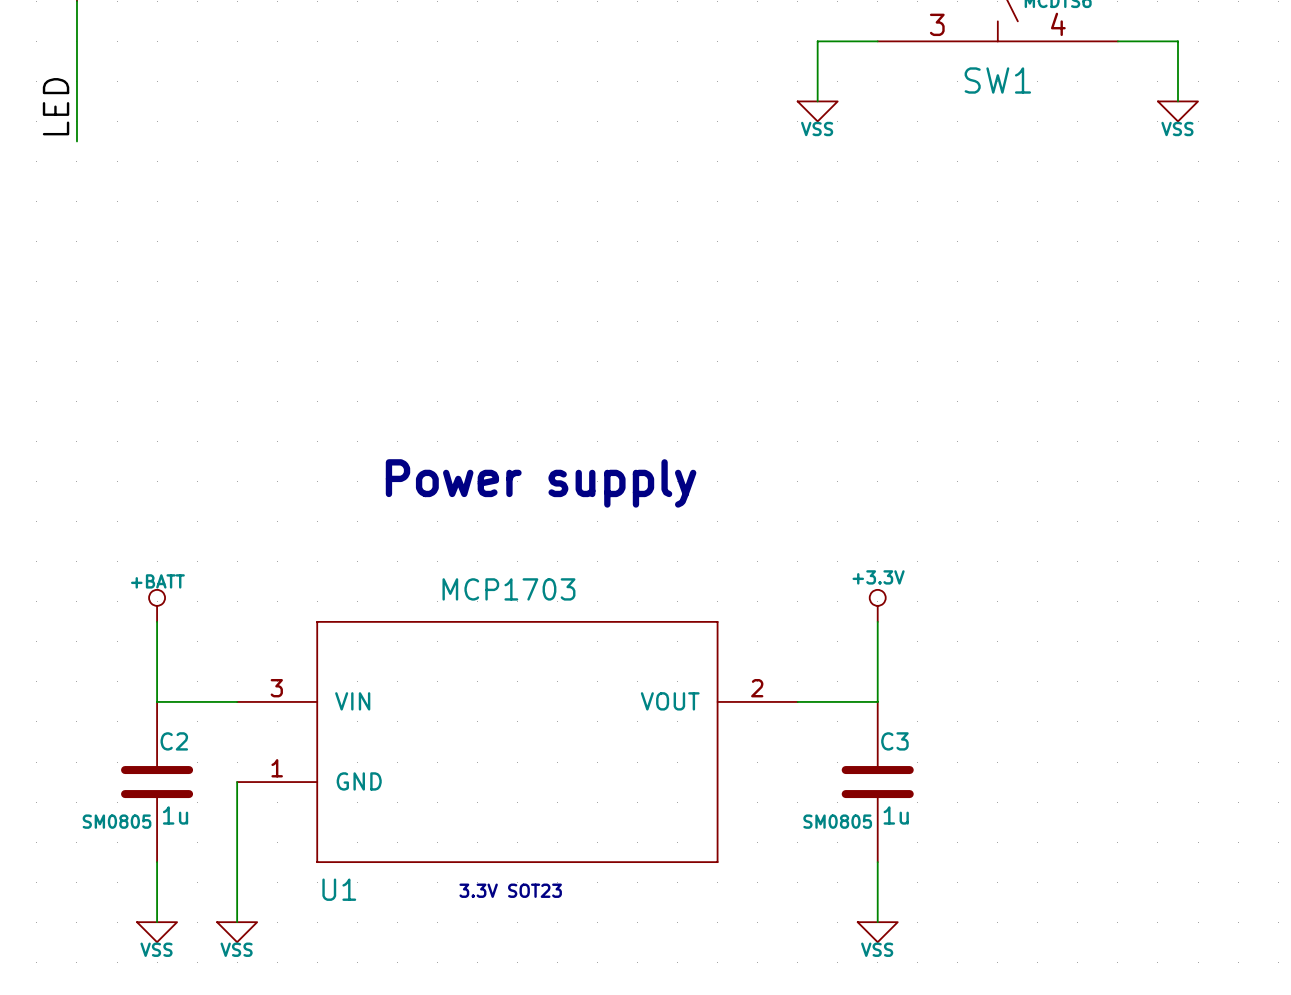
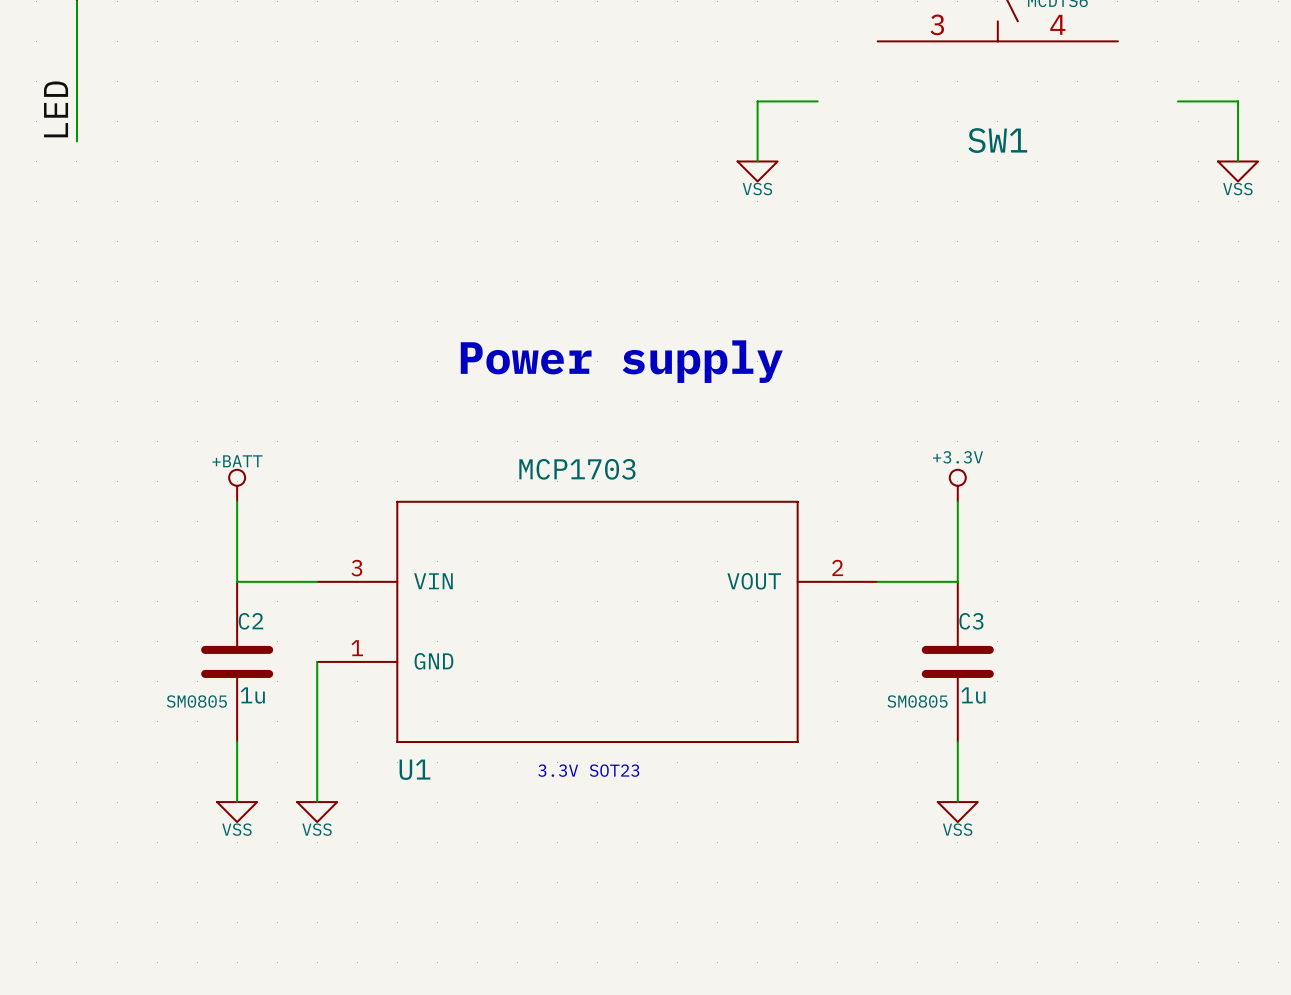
wire: (877, 41) (817, 41) (817, 101) -> (757, 161) (757, 101) (817, 101)
wire: (1117, 41) (1177, 41) (1177, 101) -> (1238, 161) (1238, 101) (1177, 101)
SW1 name position: SW1 (997, 80) -> SW1 (997, 140)
power symbol position: VSS (817, 111) -> VSS (757, 171)
power symbol position: VSS (1177, 111) -> VSS (1238, 171)
text position: Power supply (541, 483) -> Power supply (621, 361)
power symbol position: +BATT (157, 605) -> +BATT (237, 485)
power symbol position: +3.3V (877, 605) -> +3.3V (957, 485)
wire: (157, 621) (157, 701) (237, 701) -> (237, 501) (237, 581) (317, 581)
wire: (877, 621) (877, 701) (797, 701) -> (957, 501) (957, 581) (877, 581)
wire: none -> (237, 742) (237, 782)
U1 position: (517, 742) -> (597, 621)
C2 position: (157, 782) -> (237, 661)
C3 position: (877, 782) -> (957, 661)
wire: (237, 802) (237, 922) -> none
power symbol: none -> VSS (237, 812)
power symbol: none -> VSS (317, 812)
wire: (157, 862) (157, 922) -> none
wire: (877, 862) (877, 922) -> (957, 742) (957, 802)
text position: 3.3V SOT23 (510, 890) -> 3.3V SOT23 (588, 770)
power symbol: VSS (157, 932) -> none
power symbol: VSS (237, 932) -> none
power symbol position: VSS (877, 932) -> VSS (957, 812)

